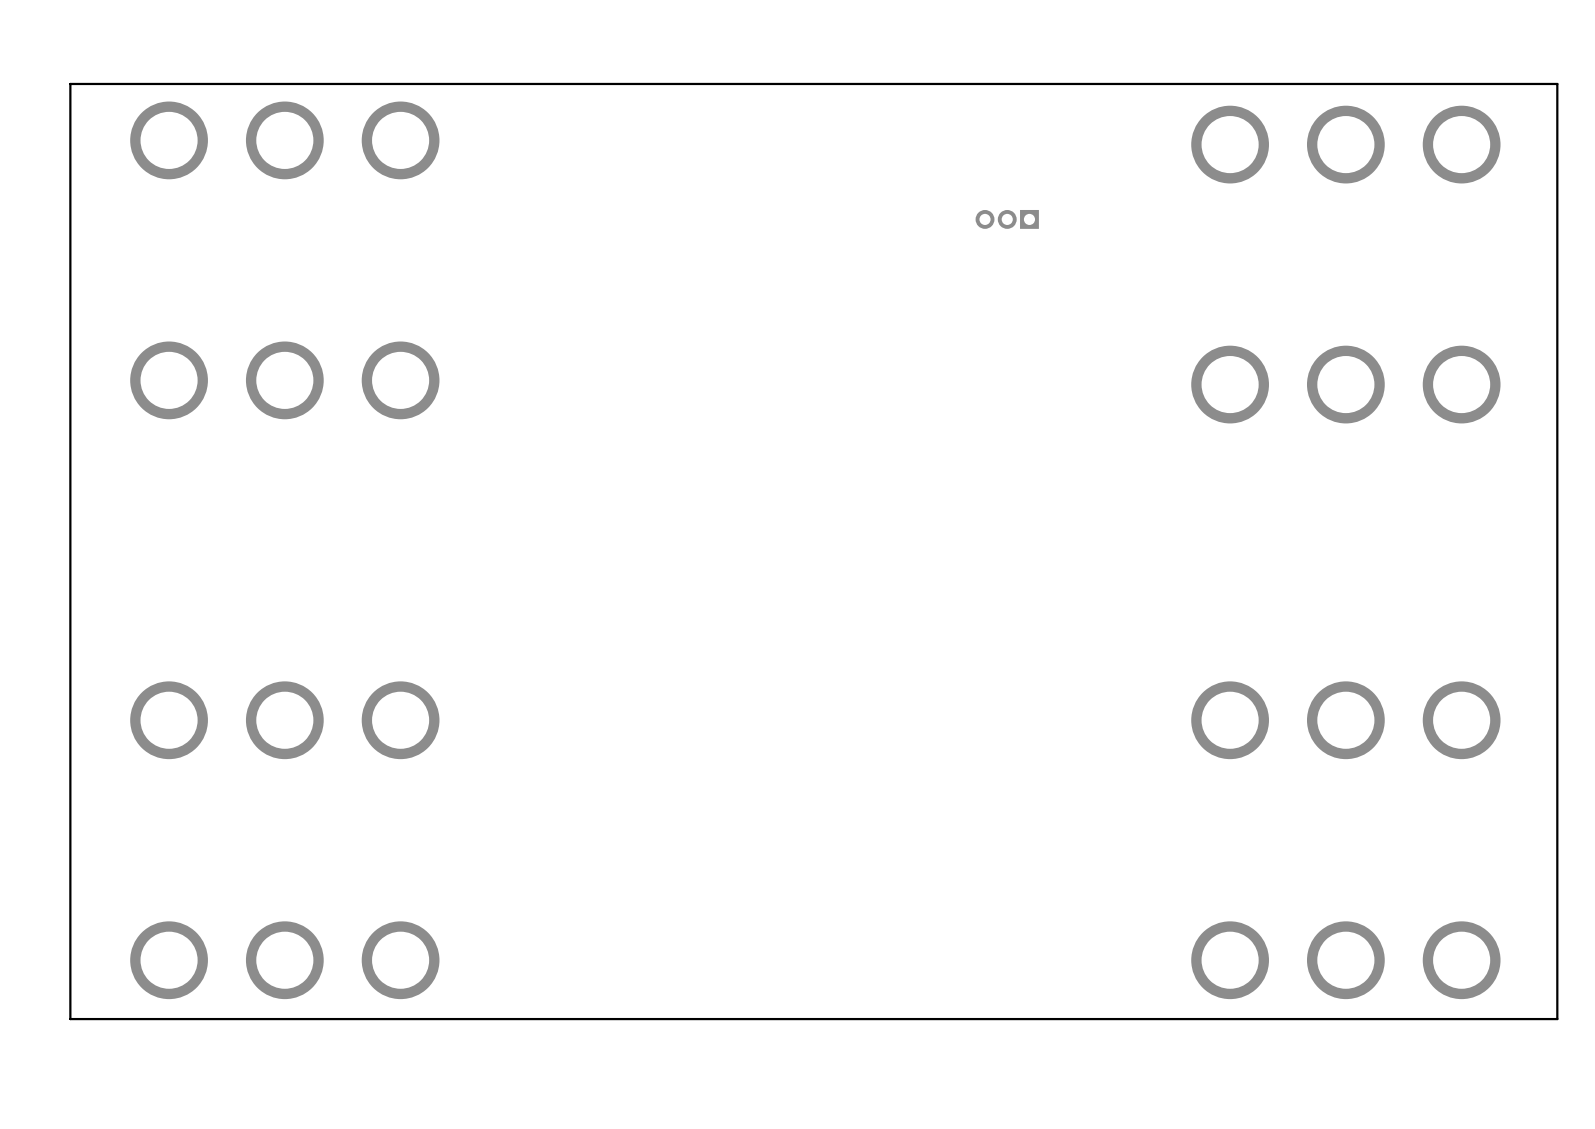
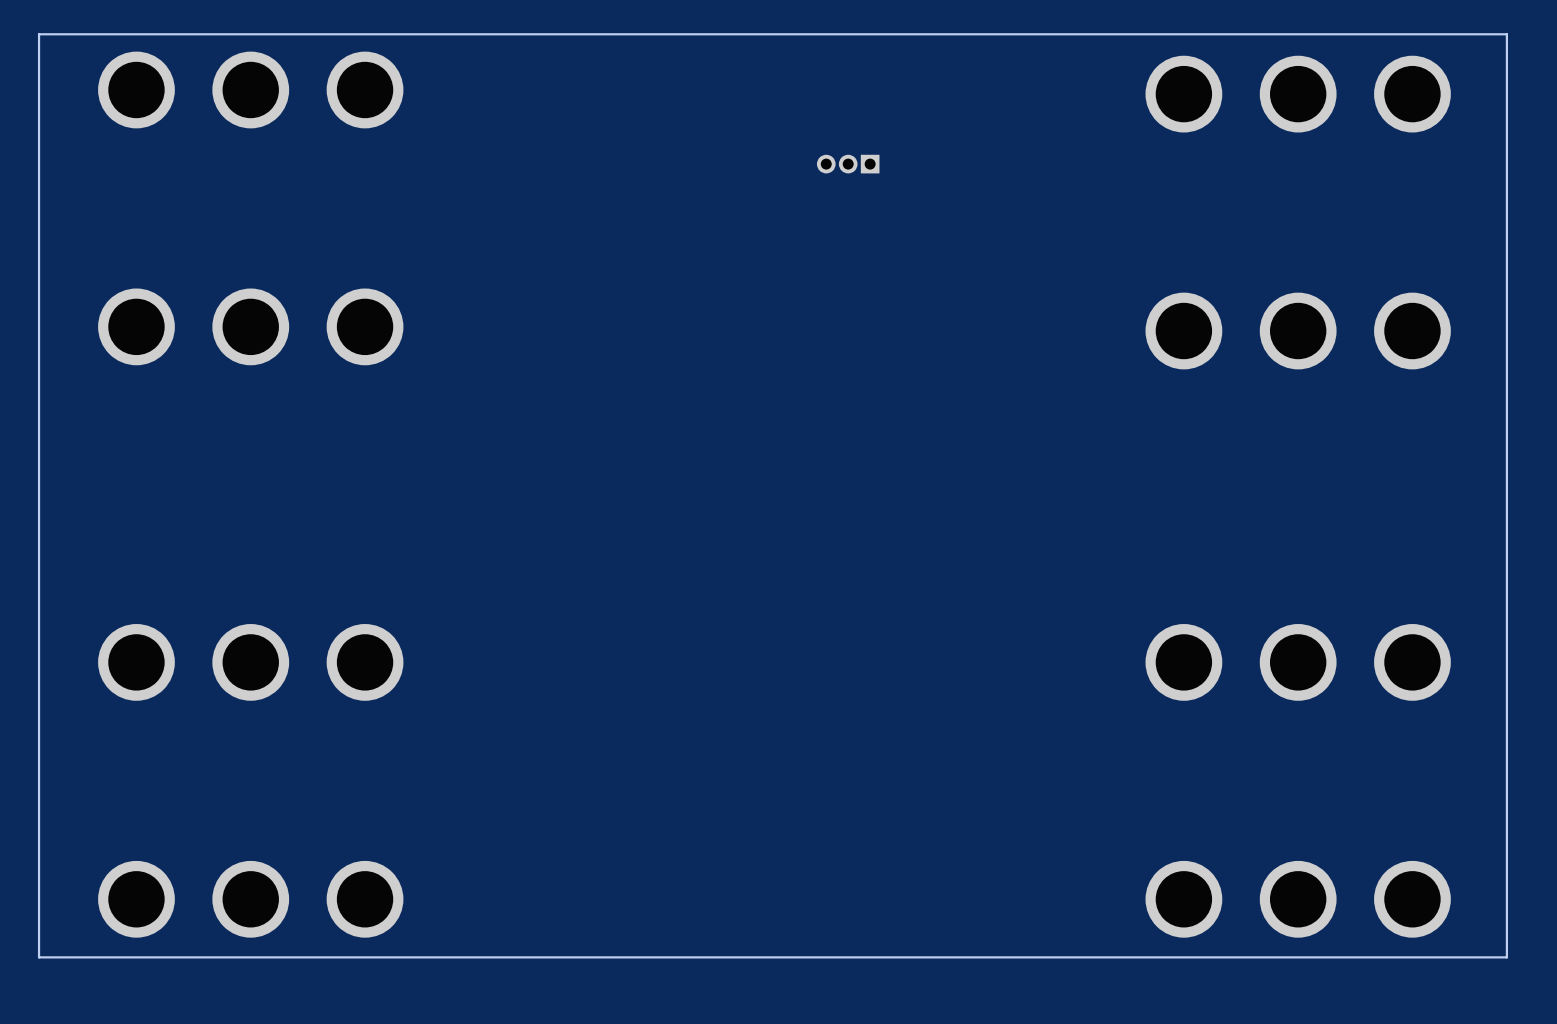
part position: (1007, 219) -> (848, 164)

